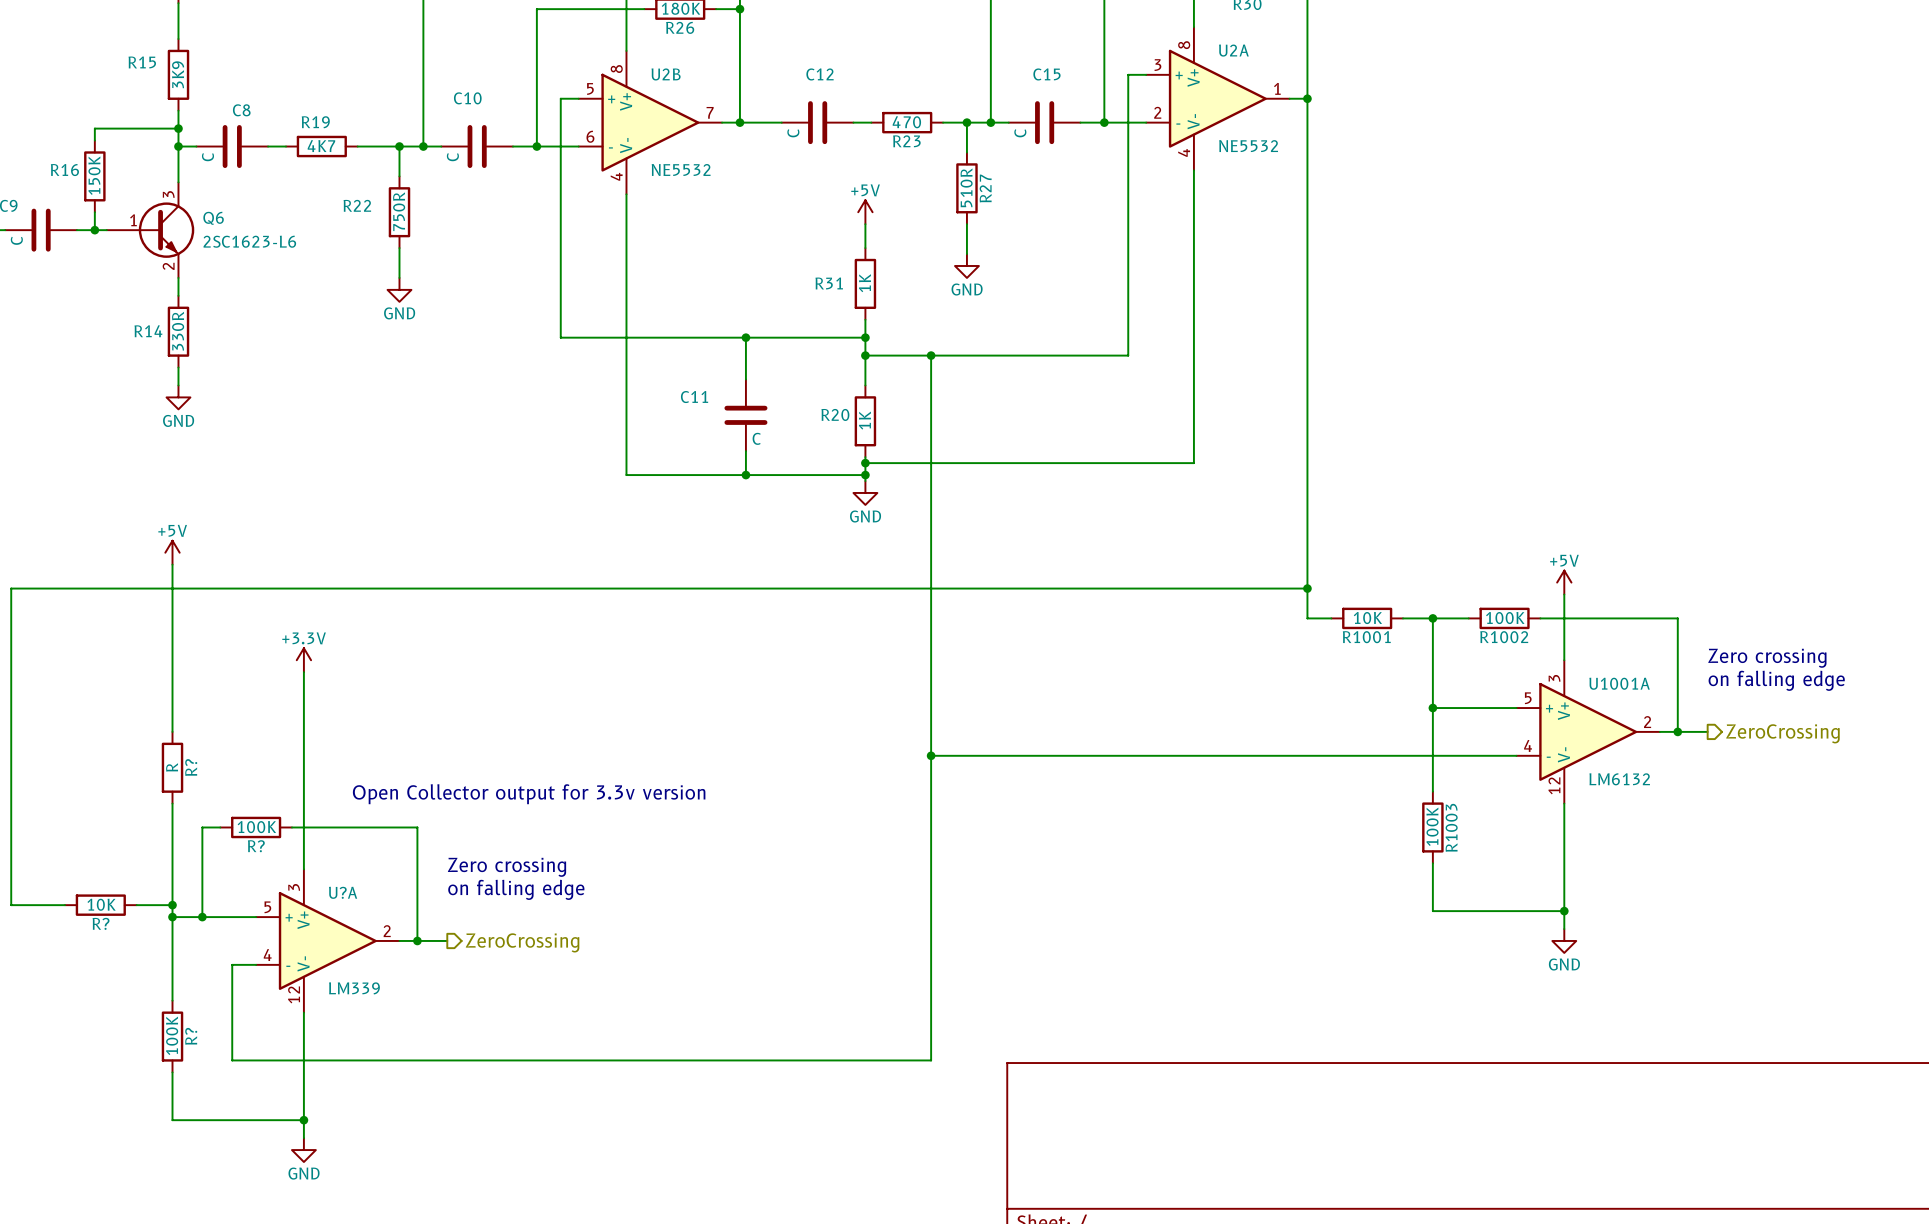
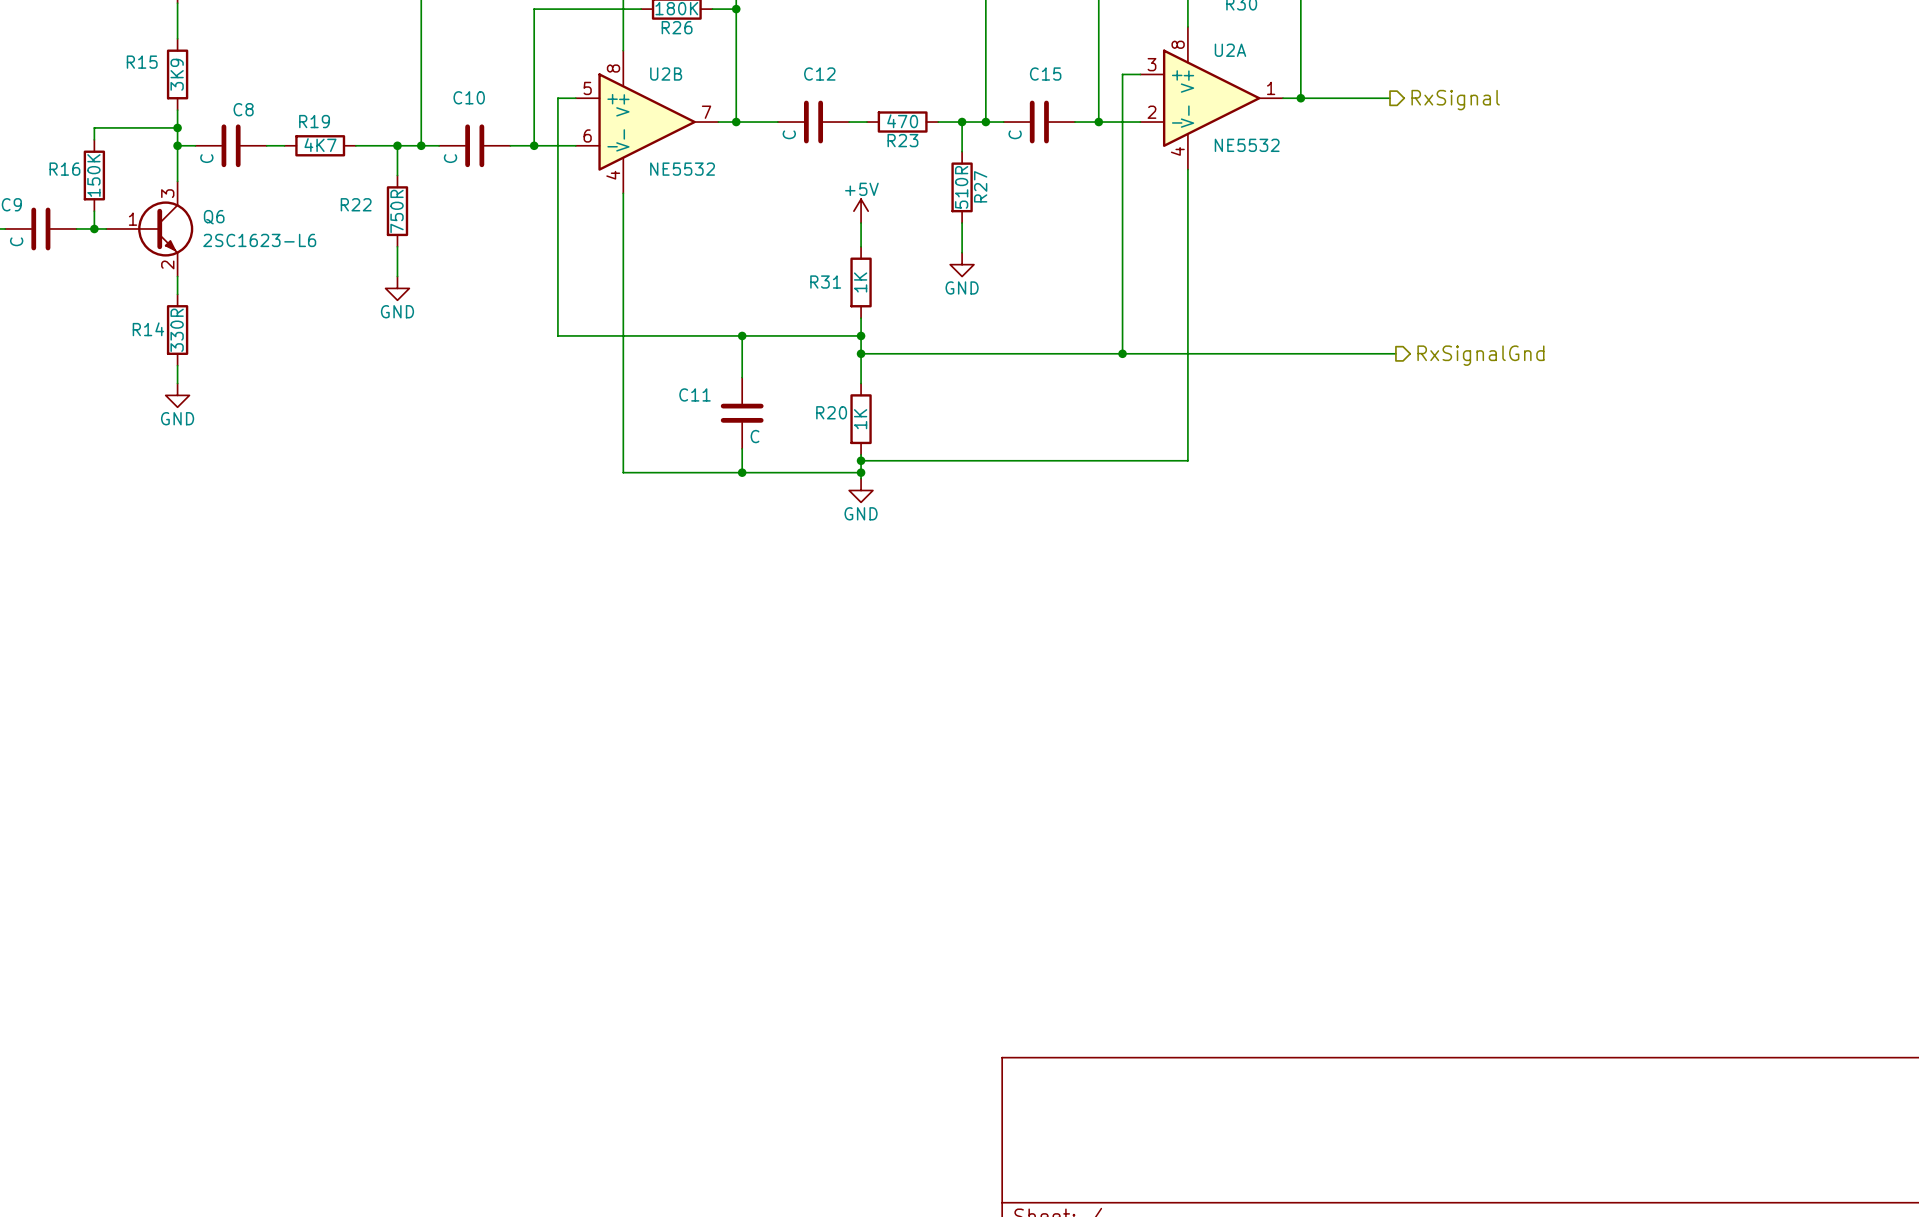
wire: (1307, 98) (1307, 618) (1331, 618) -> (1300, 98) (1390, 98)
hierarchical label: none -> RxSignal (1455, 100)
wire: (931, 355) (931, 1060) (232, 1060) (232, 964) (256, 964) -> none
junction: (931, 355) -> none
wire: none -> (1122, 353) (1395, 353)
junction: none -> (1122, 353)
hierarchical label: none -> RxSignalGnd (1480, 355)
power symbol: +5V (172, 552) -> none
wire: (172, 564) (172, 731) -> none
power symbol: +5V (1564, 582) -> none
wire: (1307, 588) (11, 588) (11, 905) (64, 905) -> none
junction: (1307, 588) -> none
wire: (1564, 594) (1564, 660) -> none
R1001: 10K (1367, 618) -> none
wire: (1403, 618) (1468, 618) -> none
wire: (1432, 618) (1432, 791) -> none
junction: (1432, 618) -> none
R1002: 100K (1504, 618) -> none
wire: (1540, 618) (1677, 618) (1677, 731) -> none
text: Zero crossing (1767, 658) -> none
power symbol: +3.3V (303, 660) -> none
wire: (303, 672) (303, 869) -> none
text: on falling edge (1776, 680) -> none
wire: (1432, 708) (1516, 708) -> none
junction: (1432, 708) -> none
U1001A: LM6132 (1588, 731) -> none
wire: (1659, 731) (1707, 731) -> none
junction: (1677, 731) -> none
hierarchical label: ZeroCrossing (1782, 733) -> none
wire: (931, 755) (1516, 755) -> none
junction: (931, 755) -> none
R?: R (172, 767) -> none
text: Open Collector output for 3.3v version (529, 794) -> none
wire: (172, 803) (172, 1000) -> none
wire: (1564, 803) (1564, 929) -> none
wire: (220, 827) (202, 827) (202, 917) -> none
R?: 100K (256, 827) -> none
wire: (291, 827) (417, 827) (417, 940) -> none
R1003: 100K (1432, 827) -> none
wire: (1432, 863) (1432, 911) (1564, 911) -> none
text: Zero crossing (506, 867) -> none
text: on falling edge (516, 889) -> none
R?: 10K (100, 905) -> none
wire: (136, 905) (172, 905) -> none
junction: (172, 905) -> none
junction: (1564, 911) -> none
wire: (172, 917) (256, 917) -> none
junction: (172, 917) -> none
junction: (202, 917) -> none
U?A: LM339 (327, 940) -> none
wire: (399, 940) (447, 940) -> none
junction: (417, 940) -> none
power symbol: GND (1564, 940) -> none
hierarchical label: ZeroCrossing (522, 942) -> none
wire: (303, 1012) (303, 1138) -> none
R?: 100K (172, 1036) -> none
wire: (172, 1072) (172, 1120) (303, 1120) -> none
junction: (303, 1120) -> none
power symbol: GND (303, 1150) -> none

